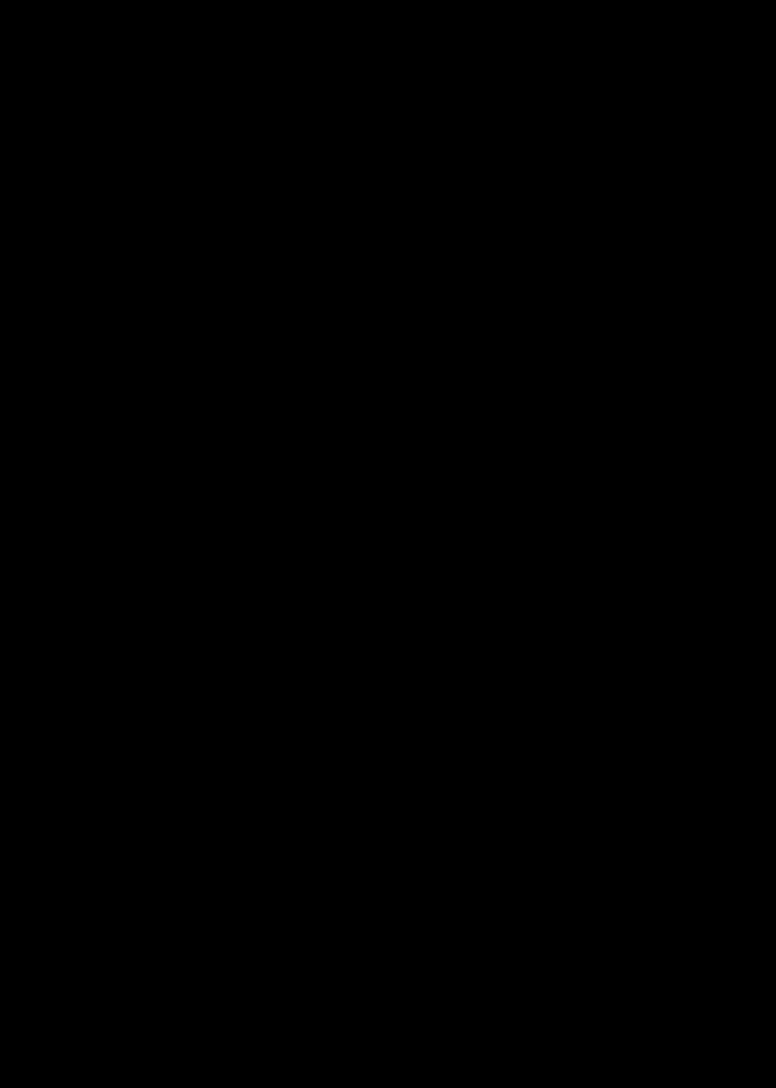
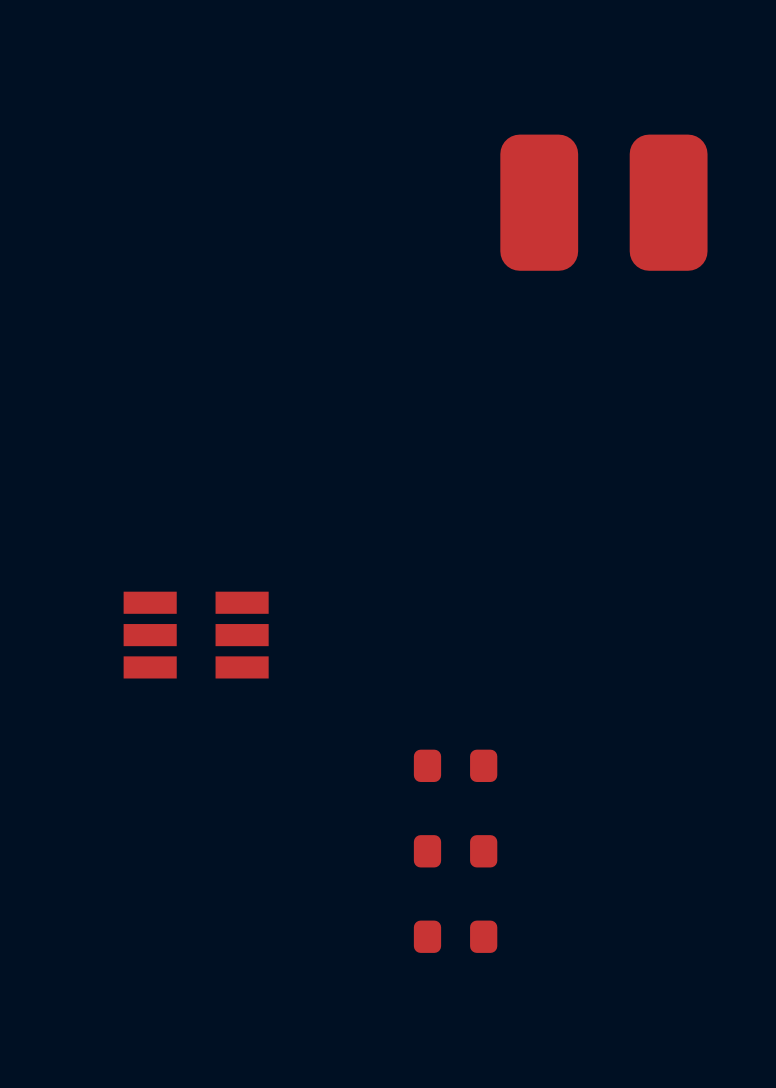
part: none -> (603, 202)
part: none -> (196, 635)
part: none -> (455, 765)
part: none -> (455, 851)
part: none -> (455, 936)

